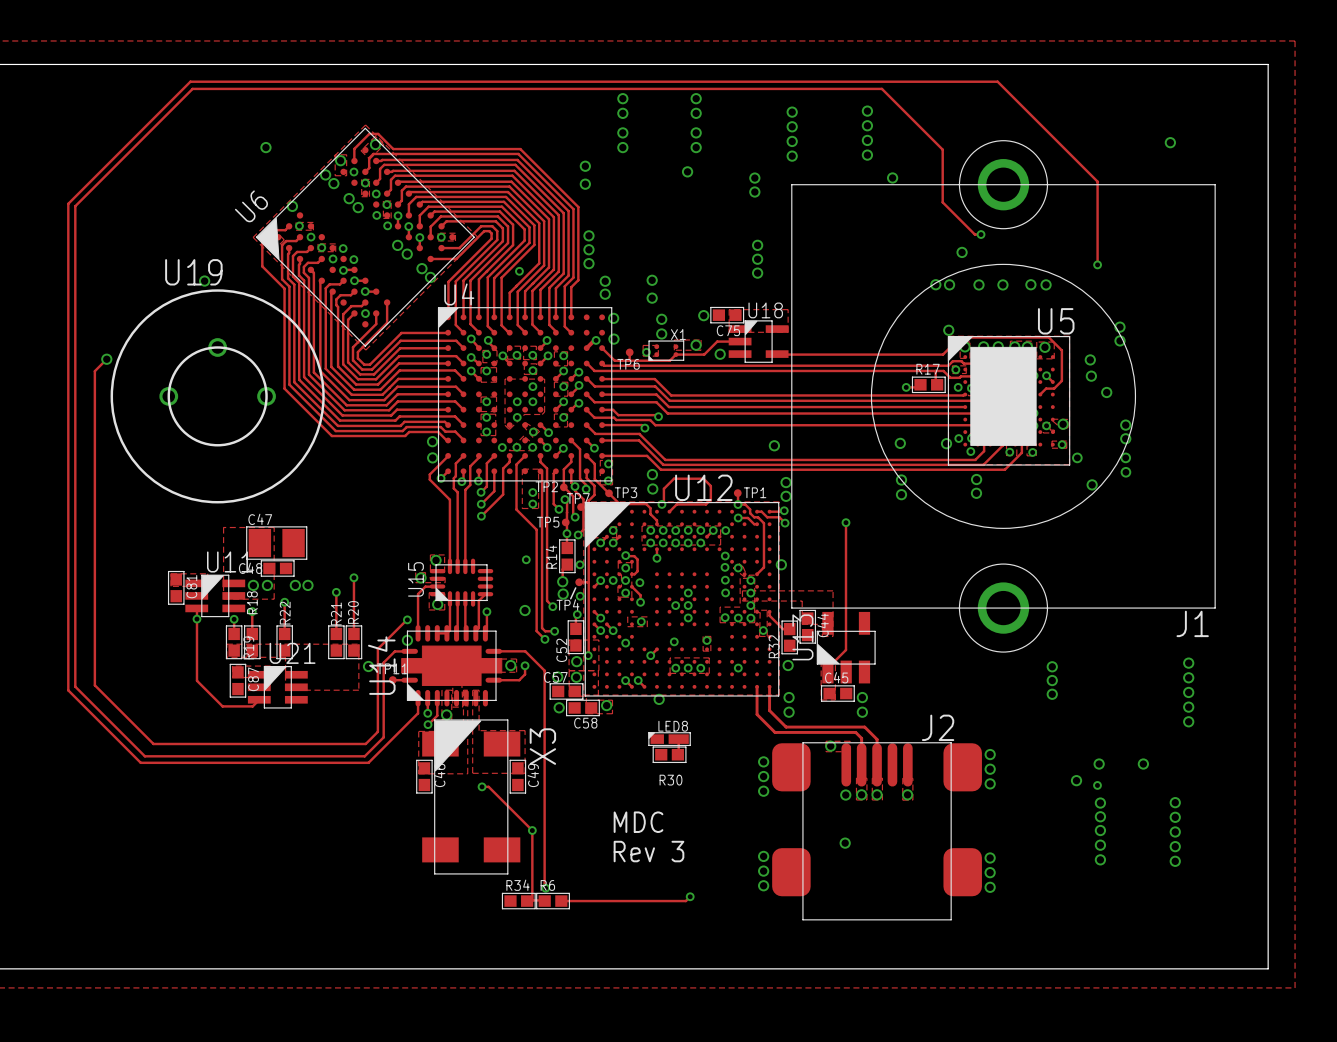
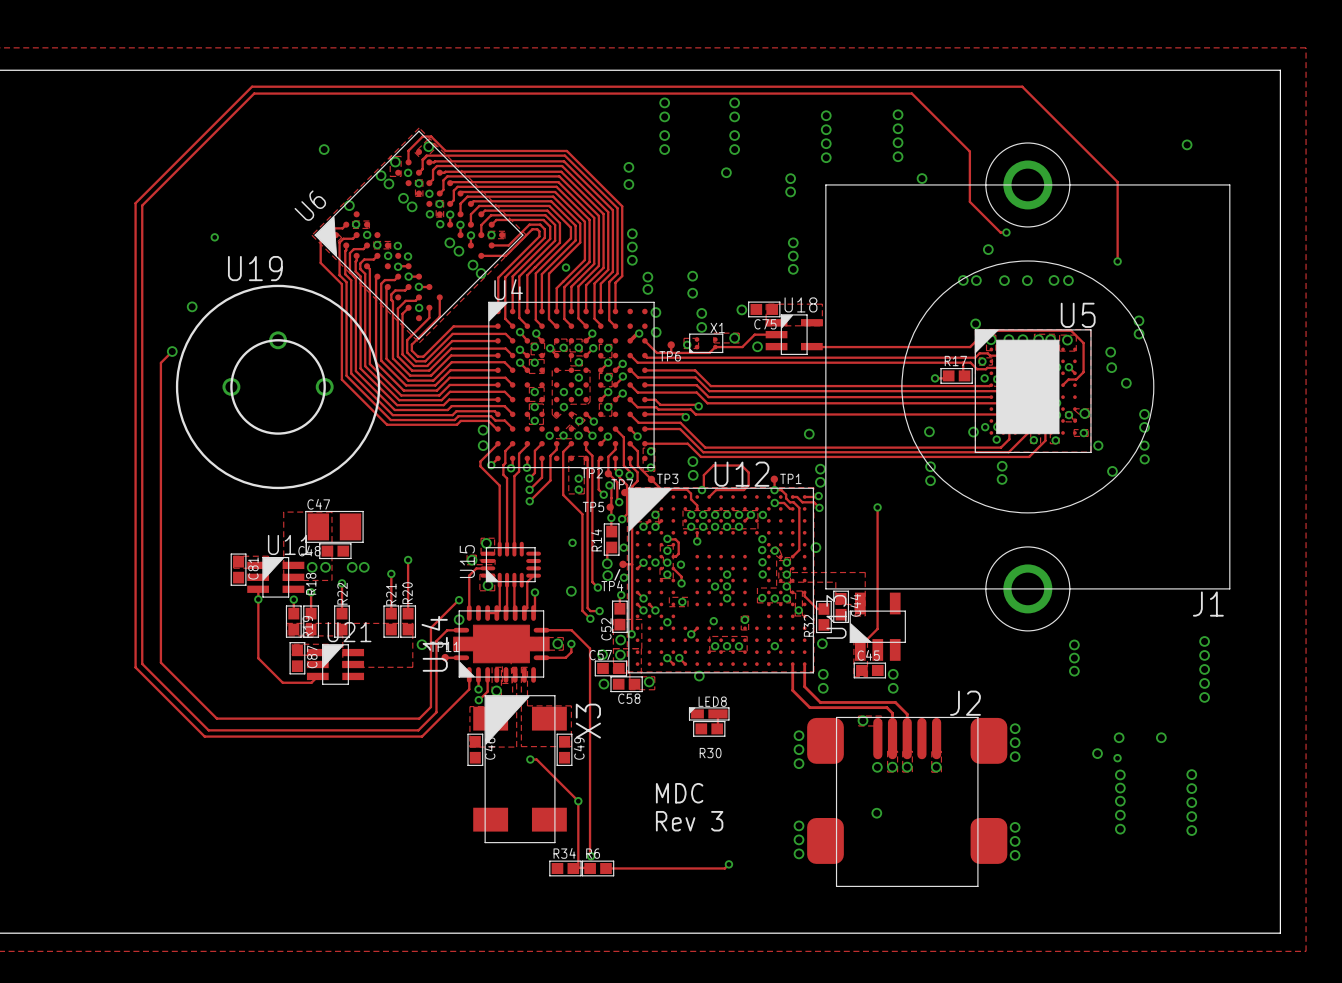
via: none -> (214, 237)
via position: (204, 281) -> (192, 306)

